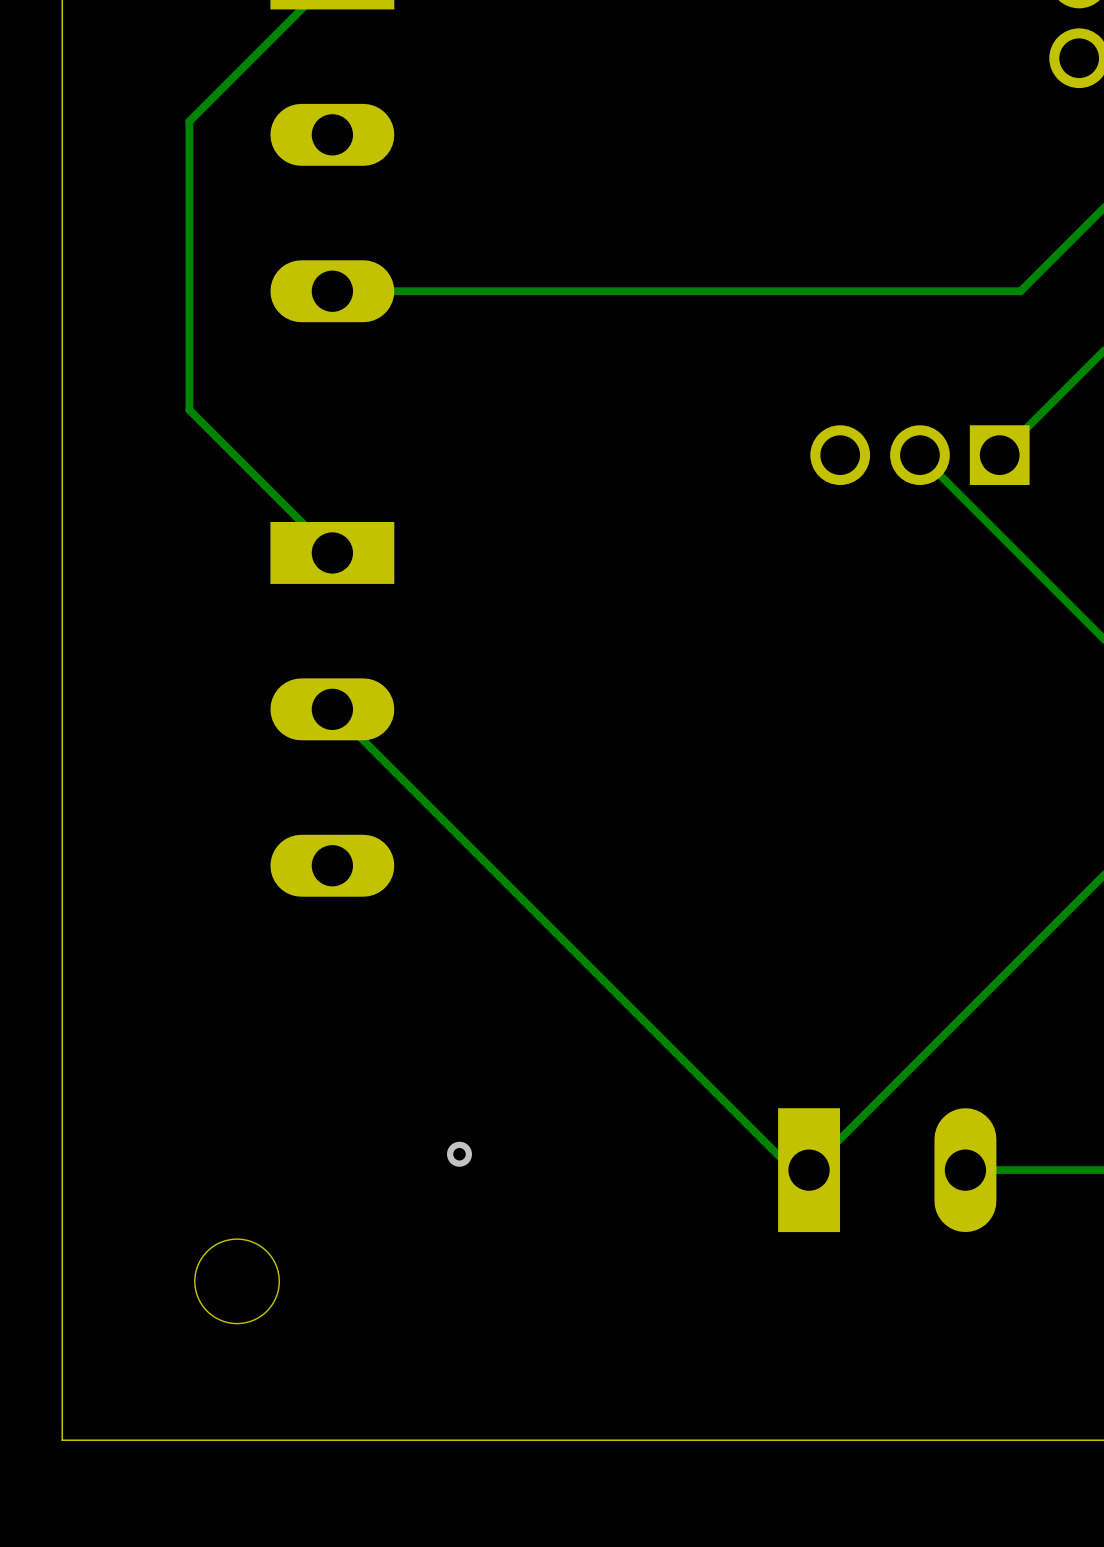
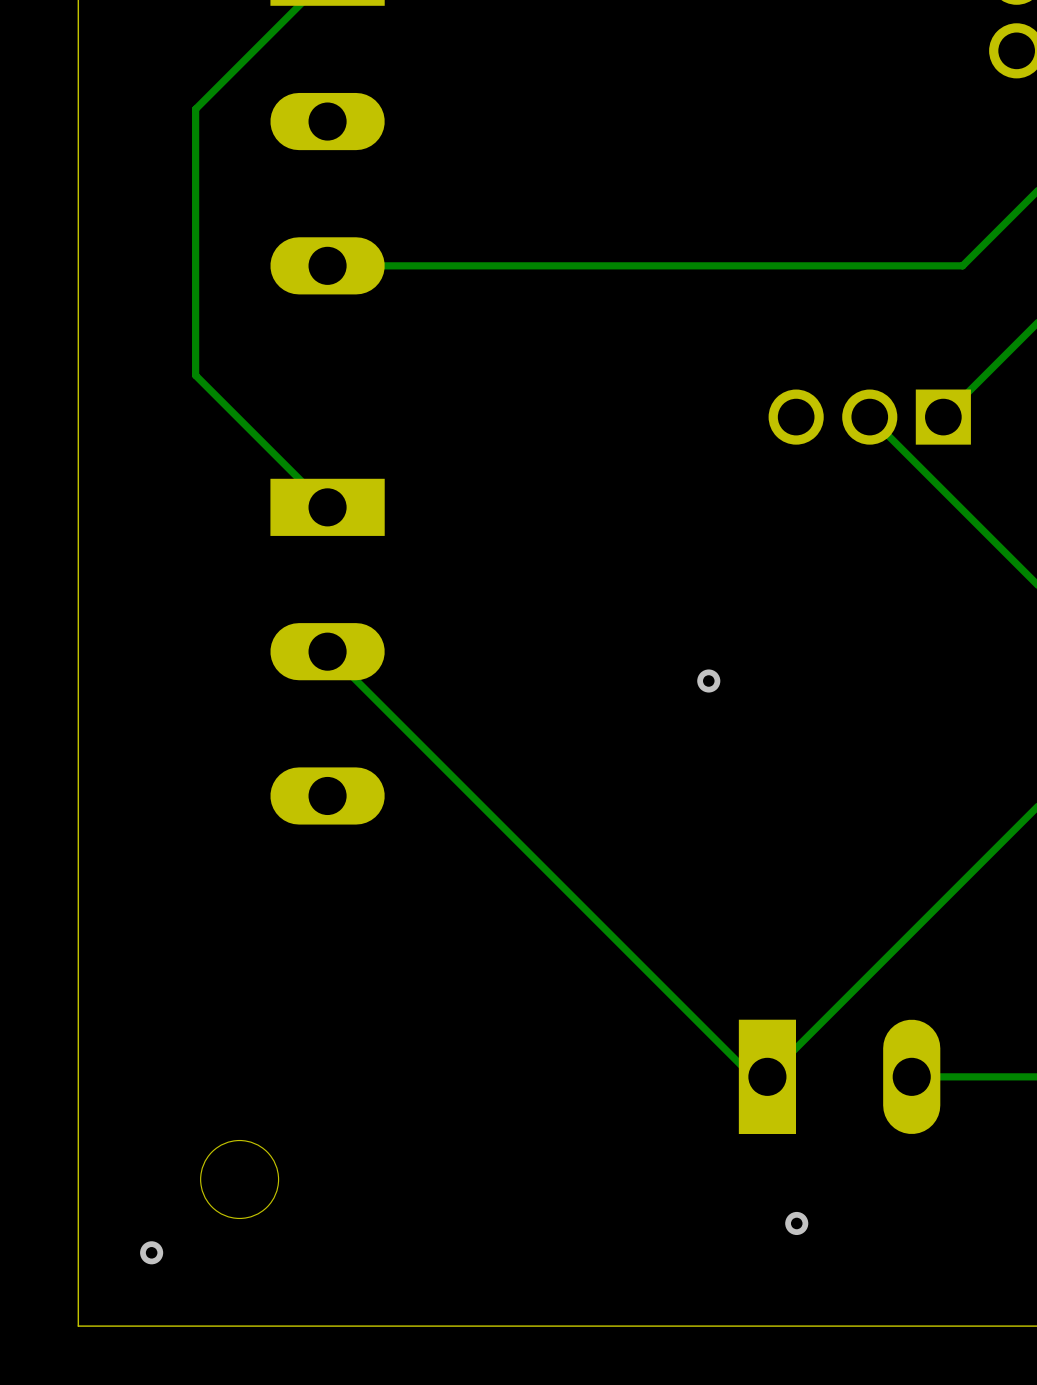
via: none -> (708, 680)
via: (459, 1154) -> none
via: none -> (796, 1223)
via: none -> (151, 1252)

